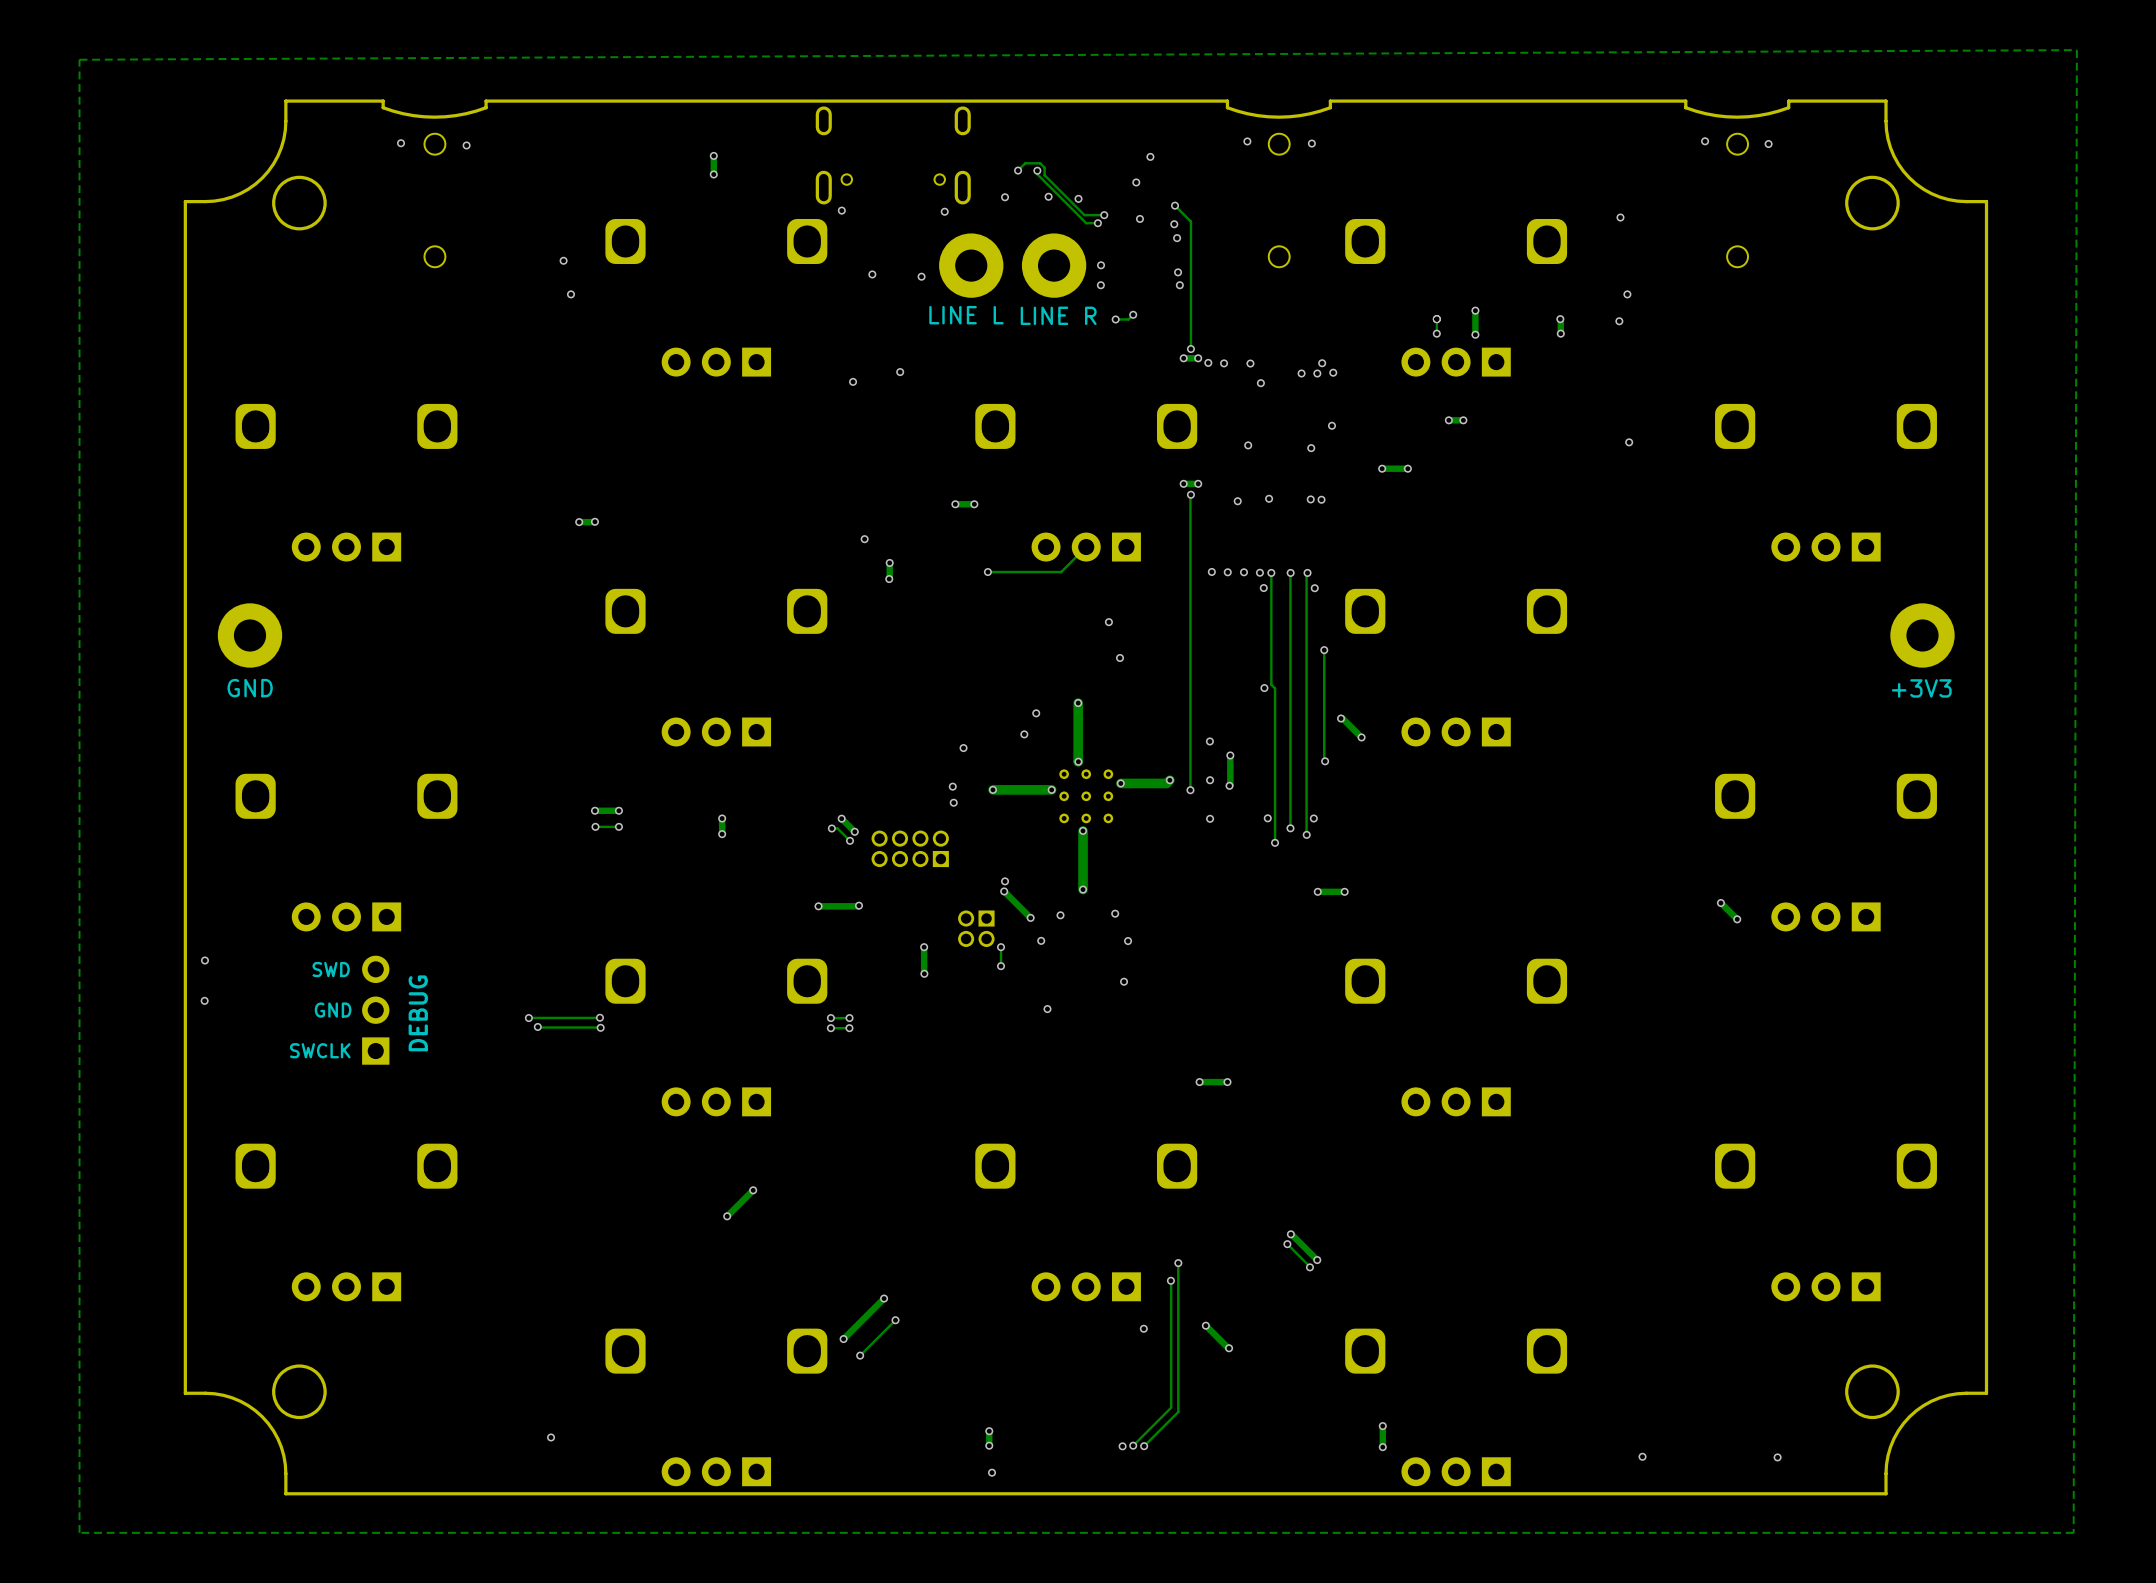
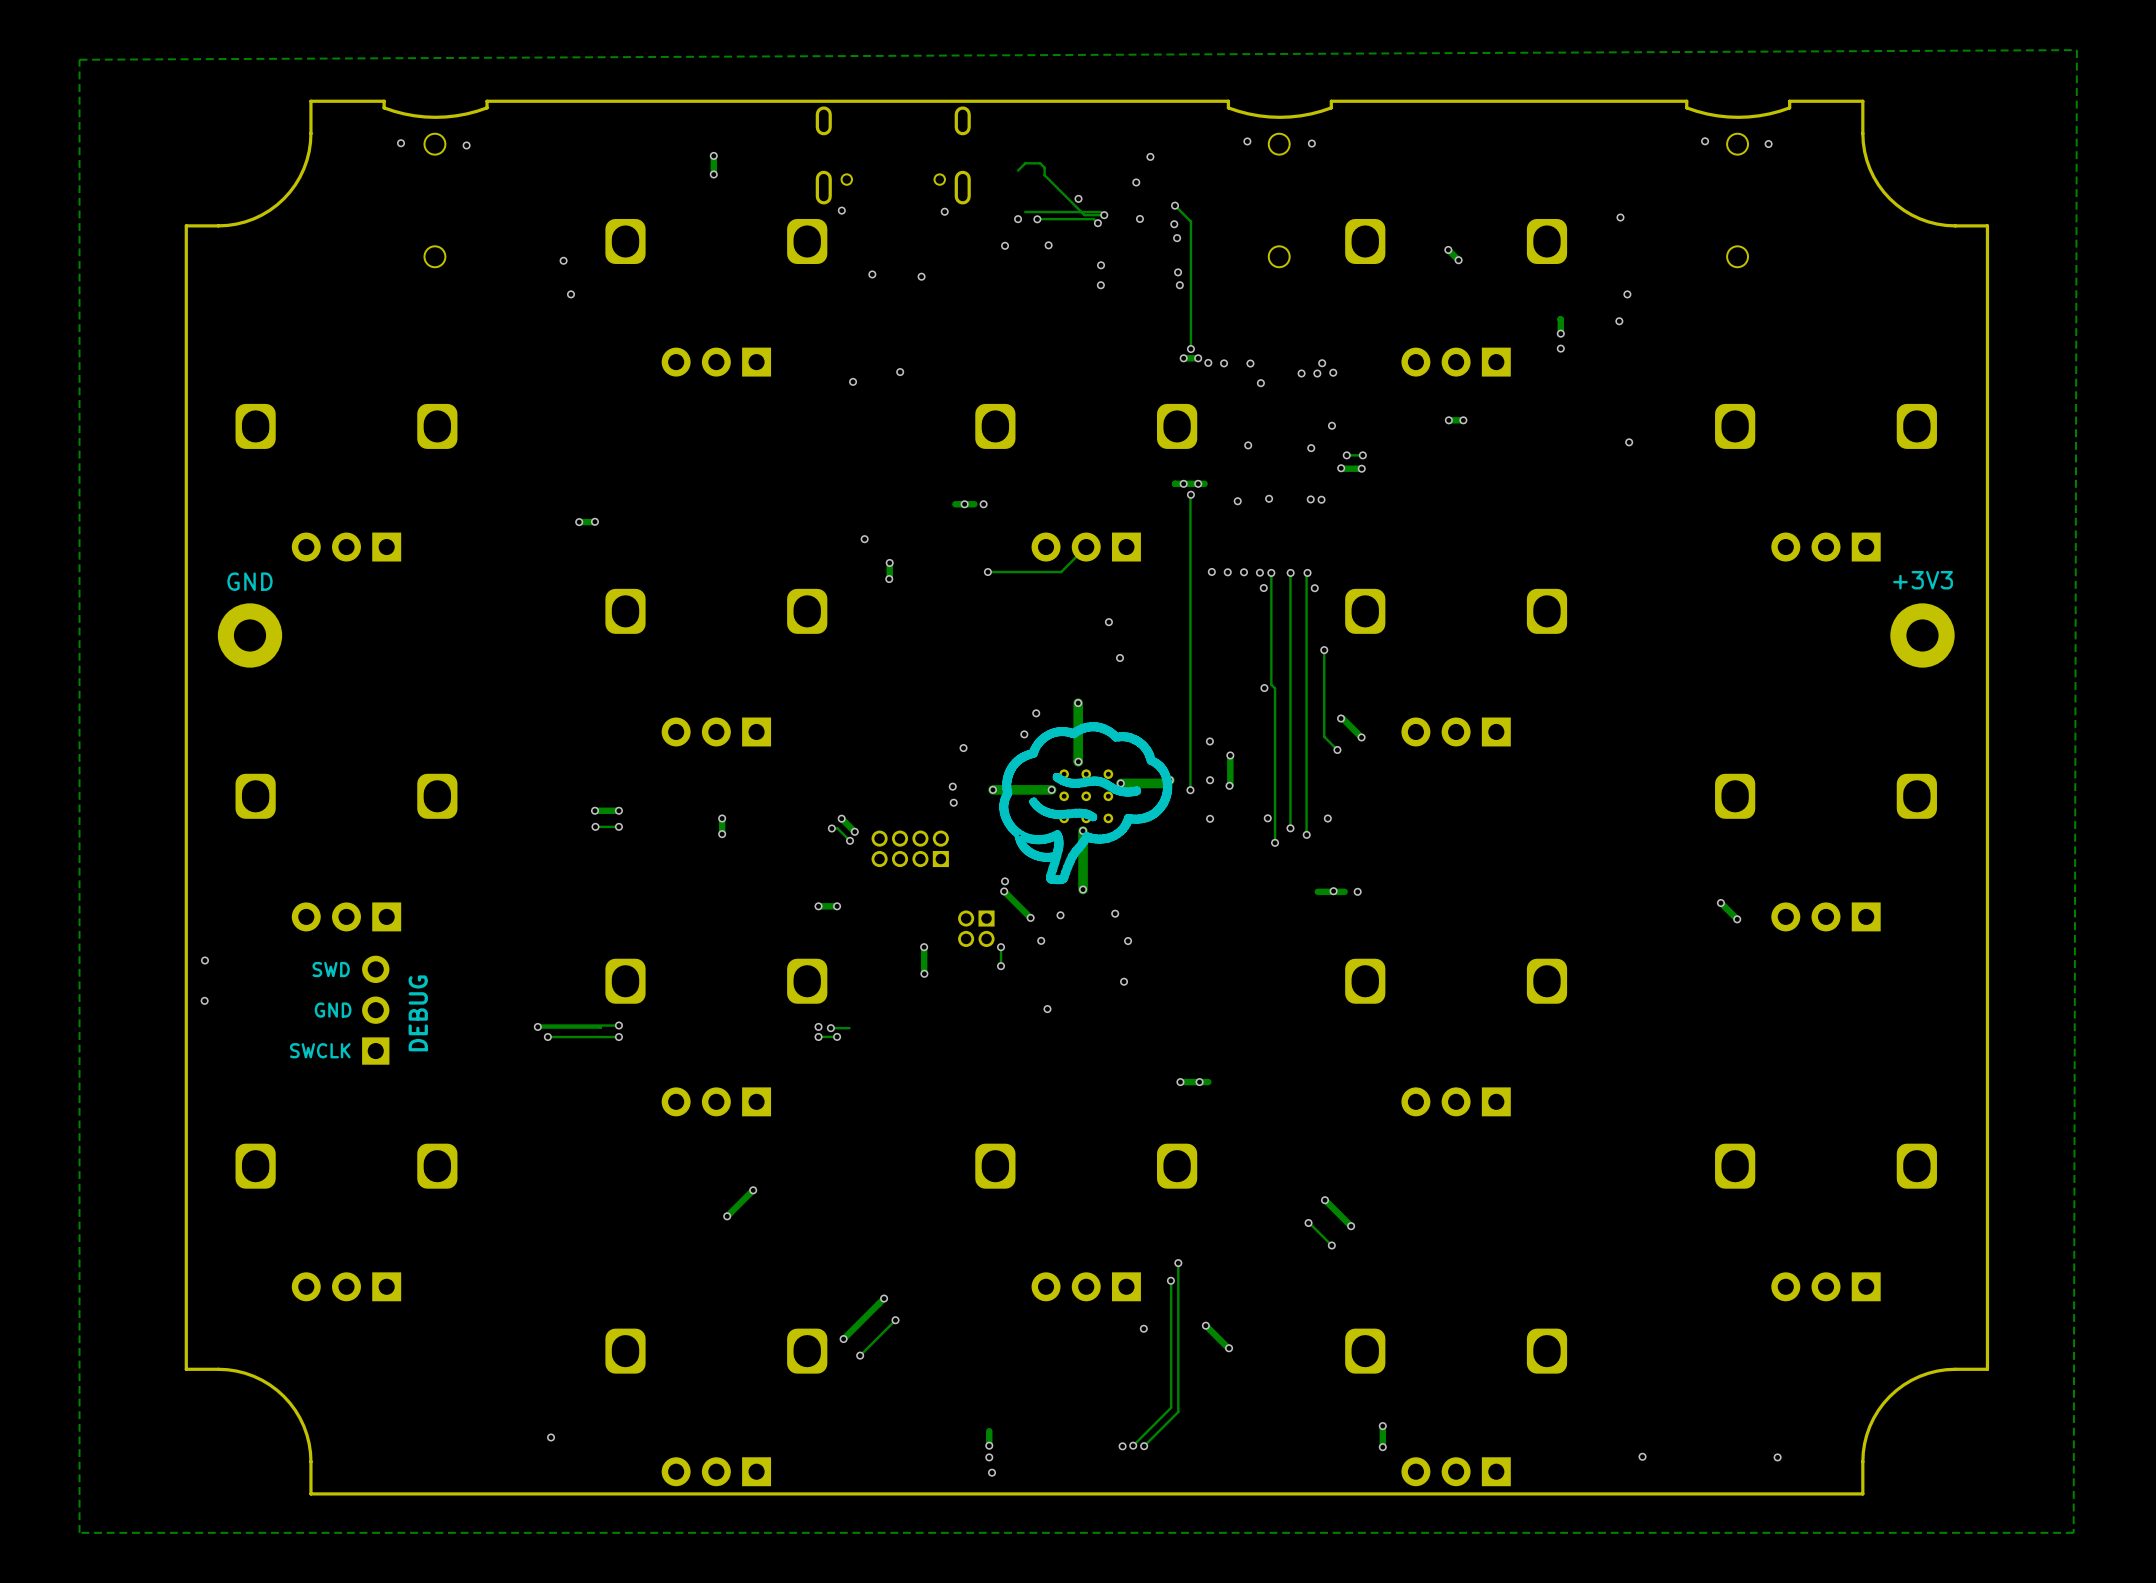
board edge: (1885, 101) (1788, 101) (1788, 107) (1778, 111) (1758, 115) (1737, 117) (1716, 115) (1695, 111) (1685, 107) (1685, 101) (1330, 101) (1330, 107) (1320, 111) (1299, 115) (1278, 117) (1257, 115) (1237, 111) (1227, 107) (1227, 101) (486, 101) (486, 107) (476, 111) (455, 115) (434, 117) (413, 115) (393, 111) (383, 107) (383, 101) (285, 101) (285, 130) (281, 147) (273, 163) (262, 178) (248, 189) (232, 197) (214, 201) (185, 201) (185, 1393) (214, 1393) (232, 1397) (248, 1405) (262, 1416) (273, 1430) (281, 1447) (285, 1464) (285, 1493) (1885, 1493) (1886, 1464) (1890, 1447) (1898, 1430) (1909, 1416) (1923, 1405) (1939, 1397) (1957, 1393) (1986, 1393) (1986, 201) (1957, 201) (1939, 197) (1923, 189) (1909, 178) (1898, 163) (1890, 147) (1886, 130) (1885, 101) -> (1862, 101) (1863, 142) (1866, 160) (1873, 177) (1889, 198) (1903, 210) (1928, 221) (1946, 225) (1987, 225) (1987, 1369) (1946, 1369) (1928, 1373) (1903, 1384) (1889, 1396) (1878, 1410) (1866, 1434) (1863, 1452) (1862, 1493) (310, 1493) (310, 1452) (306, 1434) (300, 1418) (283, 1396) (262, 1380) (245, 1373) (227, 1369) (186, 1369) (186, 225) (227, 225) (245, 221) (262, 214) (283, 198) (300, 177) (306, 160) (310, 142) (310, 101) (384, 101) (384, 107) (394, 111) (414, 115) (435, 117) (456, 115) (477, 111) (487, 107) (487, 101) (1228, 101) (1228, 107) (1238, 111) (1258, 115) (1279, 117) (1300, 115) (1321, 111) (1331, 107) (1331, 101) (1686, 101) (1686, 107) (1696, 111) (1717, 115) (1738, 117) (1759, 115) (1779, 111) (1789, 107) (1789, 101) (1862, 101)
via: (1018, 170) -> none
track: (1037, 170) (1037, 174) (1086, 223) (1097, 223) -> (1037, 219) (1093, 219) (1097, 223)
via: (1037, 170) -> none
round board edge: [272, 175, 327, 231] -> none
round board edge: [1845, 175, 1900, 231] -> none
via: (1048, 196) -> none
via: (1005, 197) -> none
track: none -> (1101, 212) (1025, 212)
via: none -> (1018, 219)
via: none -> (1037, 219)
via: none -> (1005, 245)
via: none -> (1048, 245)
track: none -> (1448, 249) (1458, 260)
via: none -> (1448, 249)
via: none -> (1458, 260)
part: (971, 265) -> none
part: (1054, 265) -> none
track: (1475, 310) (1475, 334) -> none
via: (1475, 310) -> none
track: (1133, 314) (1128, 319) (1115, 319) -> none
via: (1133, 314) -> none
via: (1115, 319) -> none
track: (1436, 319) (1436, 333) -> none
via: (1436, 319) -> none
via position: (1560, 319) -> (1560, 348)
via: (1436, 333) -> none
via: (1475, 334) -> none
via: none -> (1346, 455)
track: none -> (1362, 455) (1346, 455)
via: none -> (1362, 455)
track: none -> (1341, 468) (1361, 468)
via: none -> (1341, 468)
via: none -> (1361, 468)
via: (1382, 468) -> none
track: (1407, 468) (1382, 468) -> none
via: (1407, 468) -> none
track: none -> (1183, 483) (1175, 483)
track: none -> (1204, 483) (1198, 483)
via: (955, 504) -> none
via: none -> (964, 504)
via: (974, 504) -> none
via: none -> (983, 504)
part text position: GND (250, 688) -> GND (249, 581)
part text position: +3V3 (1921, 688) -> +3V3 (1923, 580)
line: none -> (1081, 726) (1073, 731) (1056, 730) (1043, 735) (1038, 740) (1031, 751) (1021, 755) (1012, 762) (1005, 778) (1005, 792) (1001, 806) (1005, 821) (1016, 835) (1020, 845) (1027, 852) (1038, 858) (1053, 859) (1048, 876) (1051, 881) (1061, 881) (1065, 879) (1074, 857) (1087, 839) (1108, 840) (1121, 832) (1130, 820) (1143, 820) (1153, 816) (1164, 806) (1169, 793) (1169, 782) (1165, 769) (1153, 759) (1148, 749) (1140, 740) (1127, 734) (1116, 735) (1099, 725) (1081, 726)
line: none -> (1084, 730) (1074, 735) (1059, 733) (1046, 738) (1040, 744) (1034, 755) (1024, 759) (1016, 765) (1009, 779) (1009, 793) (1006, 808) (1008, 817) (1014, 827) (1023, 833) (1032, 837) (1044, 837) (1057, 832) (1059, 834) (1060, 849) (1053, 877) (1061, 876) (1070, 855) (1085, 834) (1100, 836) (1112, 834) (1121, 827) (1127, 816) (1141, 816) (1153, 811) (1160, 802) (1164, 793) (1165, 782) (1162, 773) (1149, 762) (1145, 751) (1139, 744) (1128, 739) (1115, 739) (1099, 729) (1084, 730)
track: (1324, 736) (1325, 761) -> (1324, 736) (1337, 749)
via position: (1325, 761) -> (1337, 749)
line: none -> (1057, 775) (1055, 776) (1055, 779) (1069, 784) (1096, 783) (1122, 793) (1138, 791) (1136, 788) (1118, 788) (1100, 779) (1073, 781) (1057, 775)
line: none -> (1034, 799) (1031, 801) (1035, 807) (1049, 815) (1060, 816) (1080, 815) (1094, 817) (1092, 814) (1083, 811) (1050, 811) (1041, 807) (1034, 799)
via position: (1313, 818) -> (1327, 818)
line: none -> (1056, 837) (1039, 841) (1021, 837) (1025, 845) (1031, 850) (1048, 855) (1054, 854) (1056, 837)
via: (1317, 891) -> none
via: none -> (1333, 891)
via: (1344, 891) -> none
via: none -> (1357, 891)
track: (859, 905) (837, 906) -> none
via position: (859, 905) -> (837, 906)
track: (599, 1017) (529, 1017) -> (618, 1037) (547, 1037)
via: (599, 1017) -> none
via: (528, 1018) -> none
via: (830, 1018) -> none
track: (849, 1018) (830, 1018) -> none
via: (849, 1018) -> none
track: none -> (618, 1025) (536, 1025)
via: none -> (618, 1025)
via: none -> (818, 1026)
via: (600, 1027) -> none
via: (849, 1028) -> none
track: none -> (837, 1036) (818, 1036)
via: none -> (837, 1036)
via: none -> (547, 1037)
via: none -> (618, 1037)
via: none -> (818, 1037)
track: (1227, 1082) (1208, 1082) -> (1199, 1082) (1180, 1082)
via position: (1227, 1082) -> (1180, 1082)
via: none -> (1324, 1200)
track: none -> (1325, 1200) (1351, 1226)
track: none -> (1308, 1223) (1331, 1245)
via: none -> (1308, 1223)
via: none -> (1351, 1226)
track: (1290, 1234) (1317, 1260) -> none
via: (1290, 1234) -> none
track: (1287, 1244) (1309, 1267) -> none
via: (1287, 1244) -> none
via: none -> (1331, 1245)
via: (1317, 1260) -> none
via: (1309, 1267) -> none
round board edge: [272, 1364, 327, 1420] -> none
round board edge: [1845, 1364, 1900, 1420] -> none
via position: (989, 1431) -> (989, 1457)

